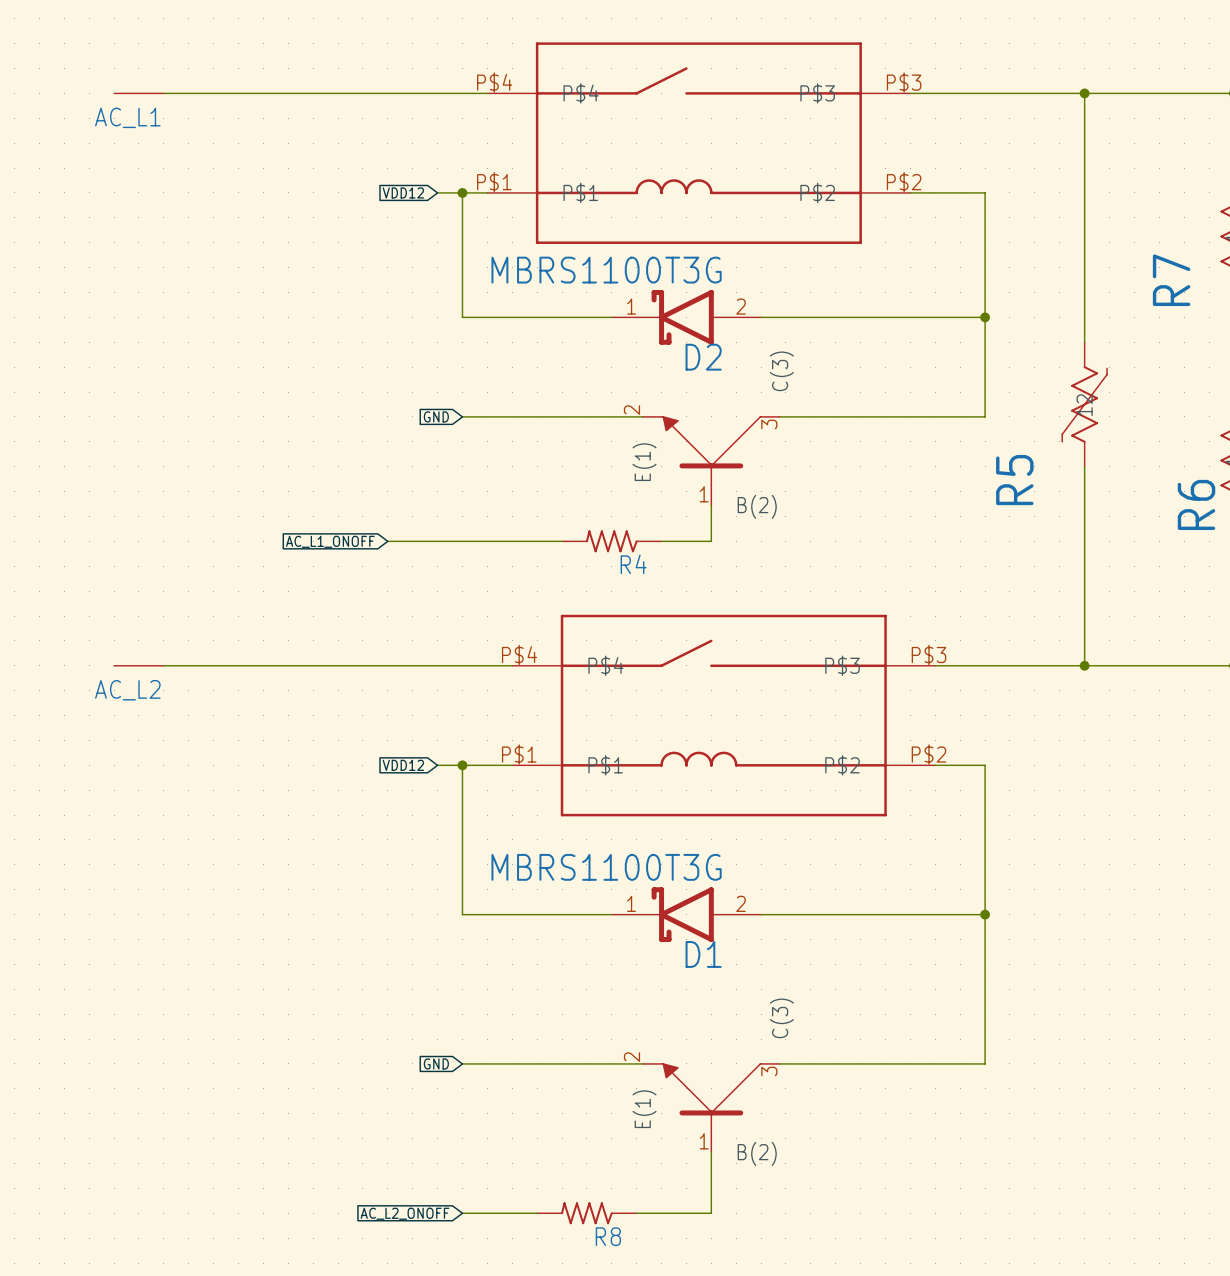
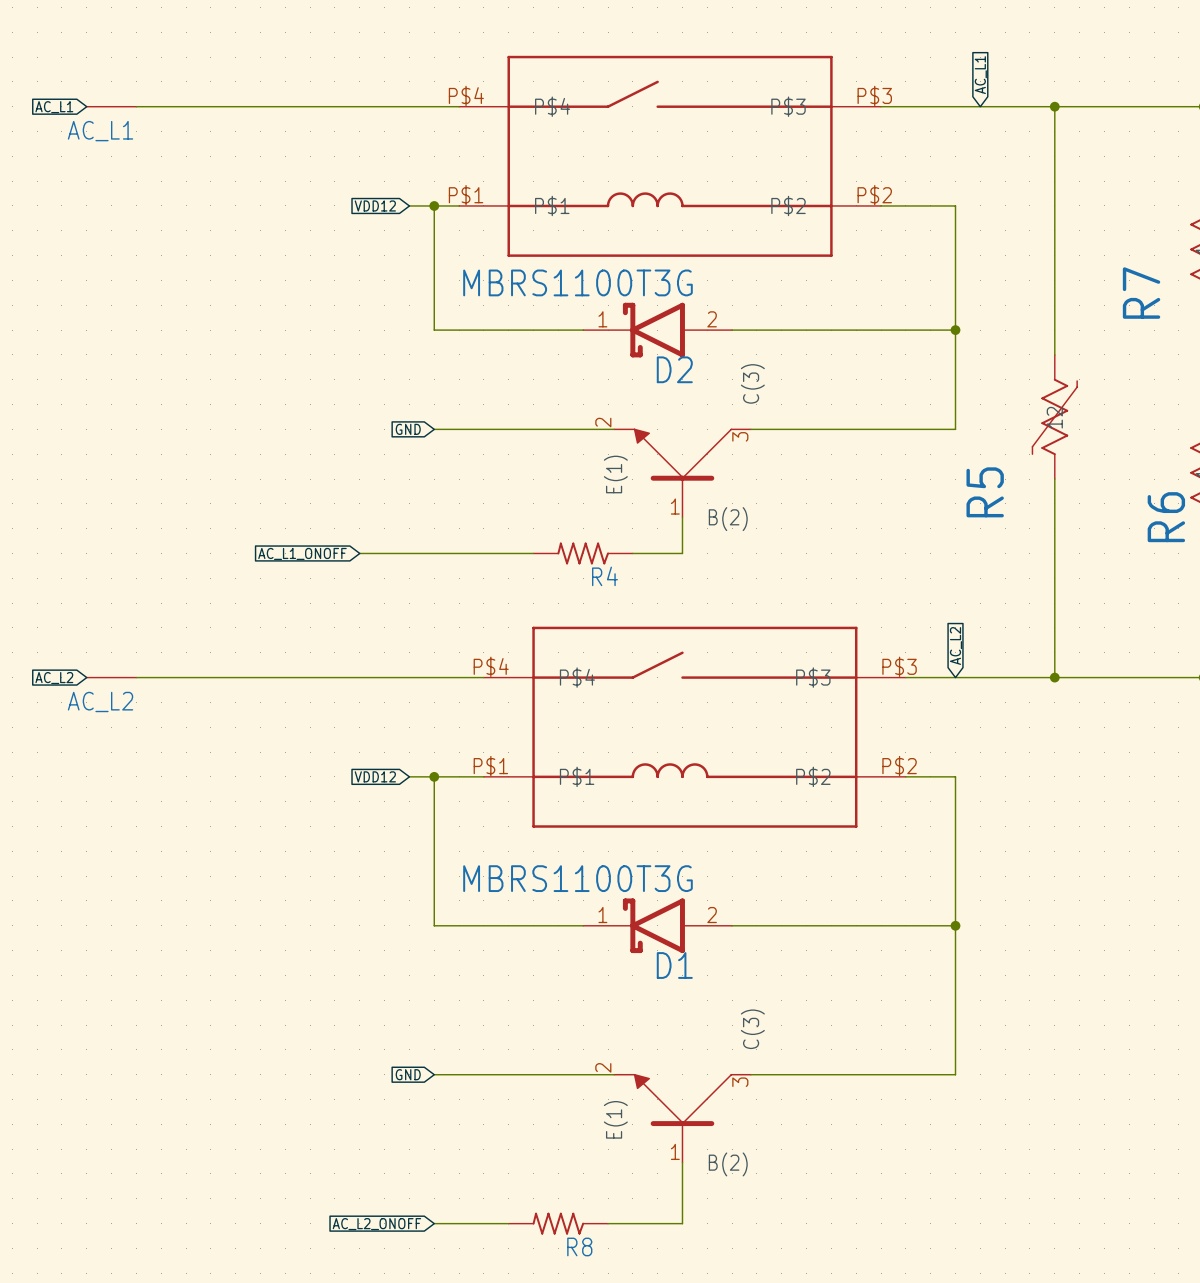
global label: none -> AC_L1 (980, 75)
global label: none -> AC_L1 (54, 107)
global label: none -> AC_L2 (955, 645)
global label: none -> AC_L2 (54, 678)

